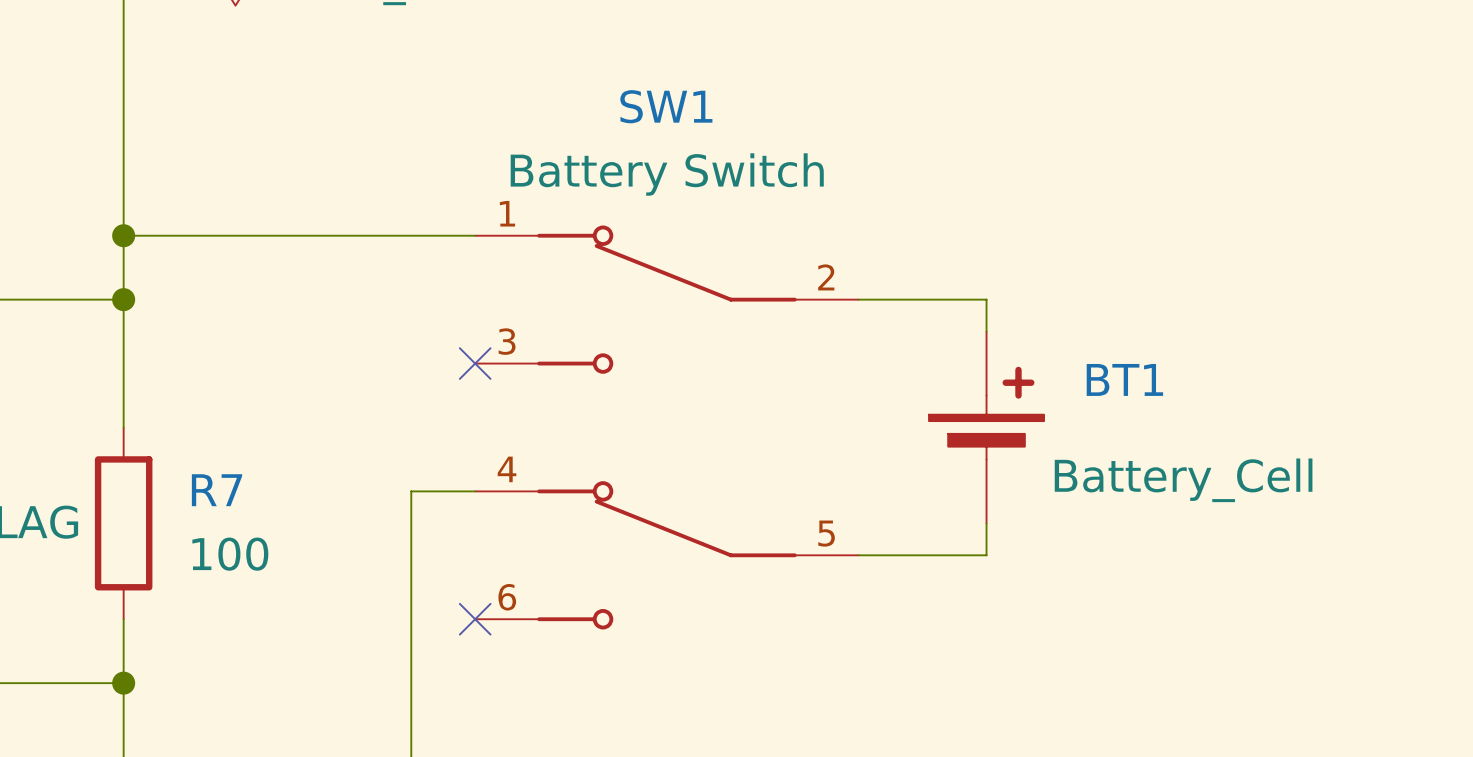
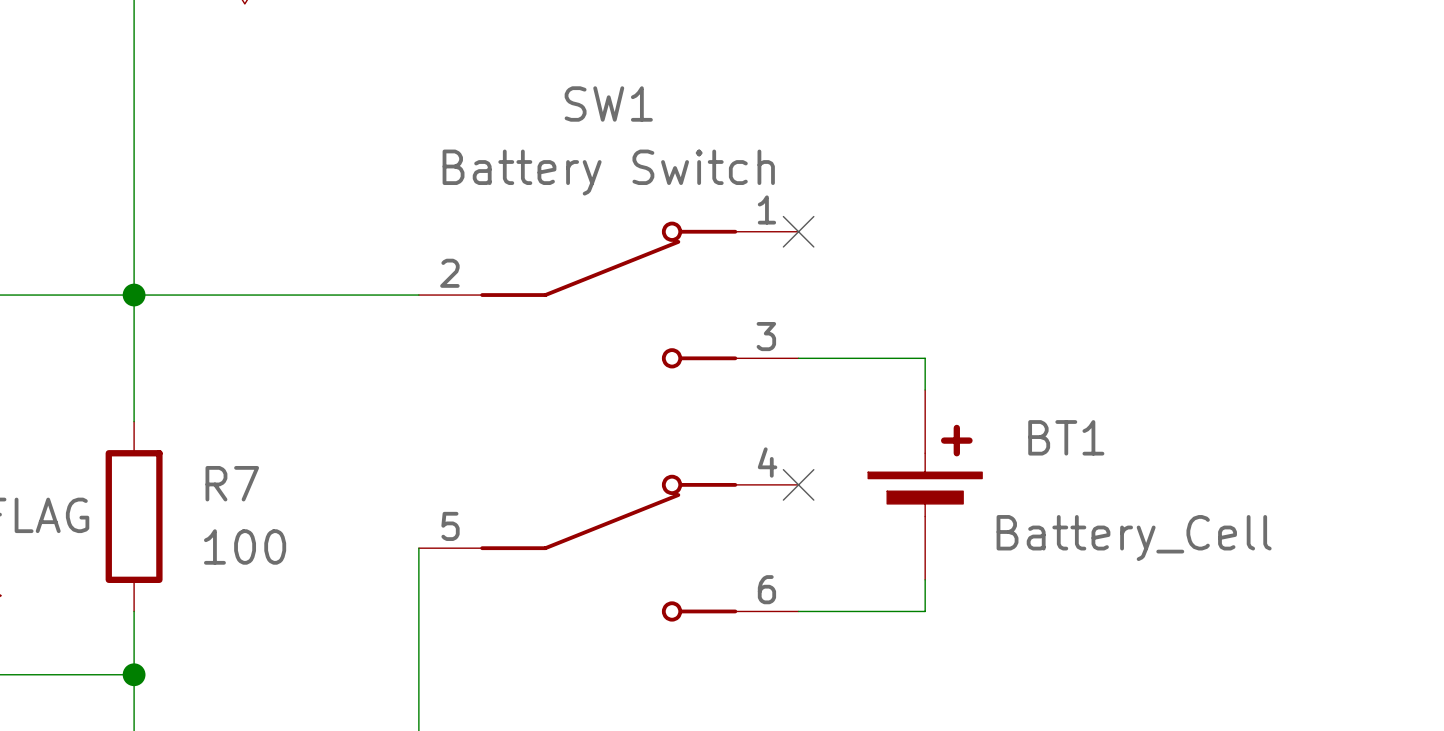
wire: (123, 235) (475, 235) -> none
junction: (123, 235) -> none
no-connect mark: none -> (798, 231)
wire: none -> (134, 295) (418, 295)
wire: (858, 299) (986, 299) (986, 331) -> (798, 358) (925, 358) (925, 389)
no-connect mark: (475, 363) -> none
SW1 flip: as is (666, 427) -> left-right (608, 421)
BT1 position: (986, 427) -> (925, 484)
wire: (475, 491) (411, 491) (411, 555) -> none
no-connect mark: none -> (798, 484)
wire: (986, 523) (986, 555) (858, 555) -> (925, 579) (925, 611) (798, 611)
no-connect mark: (475, 619) -> none

